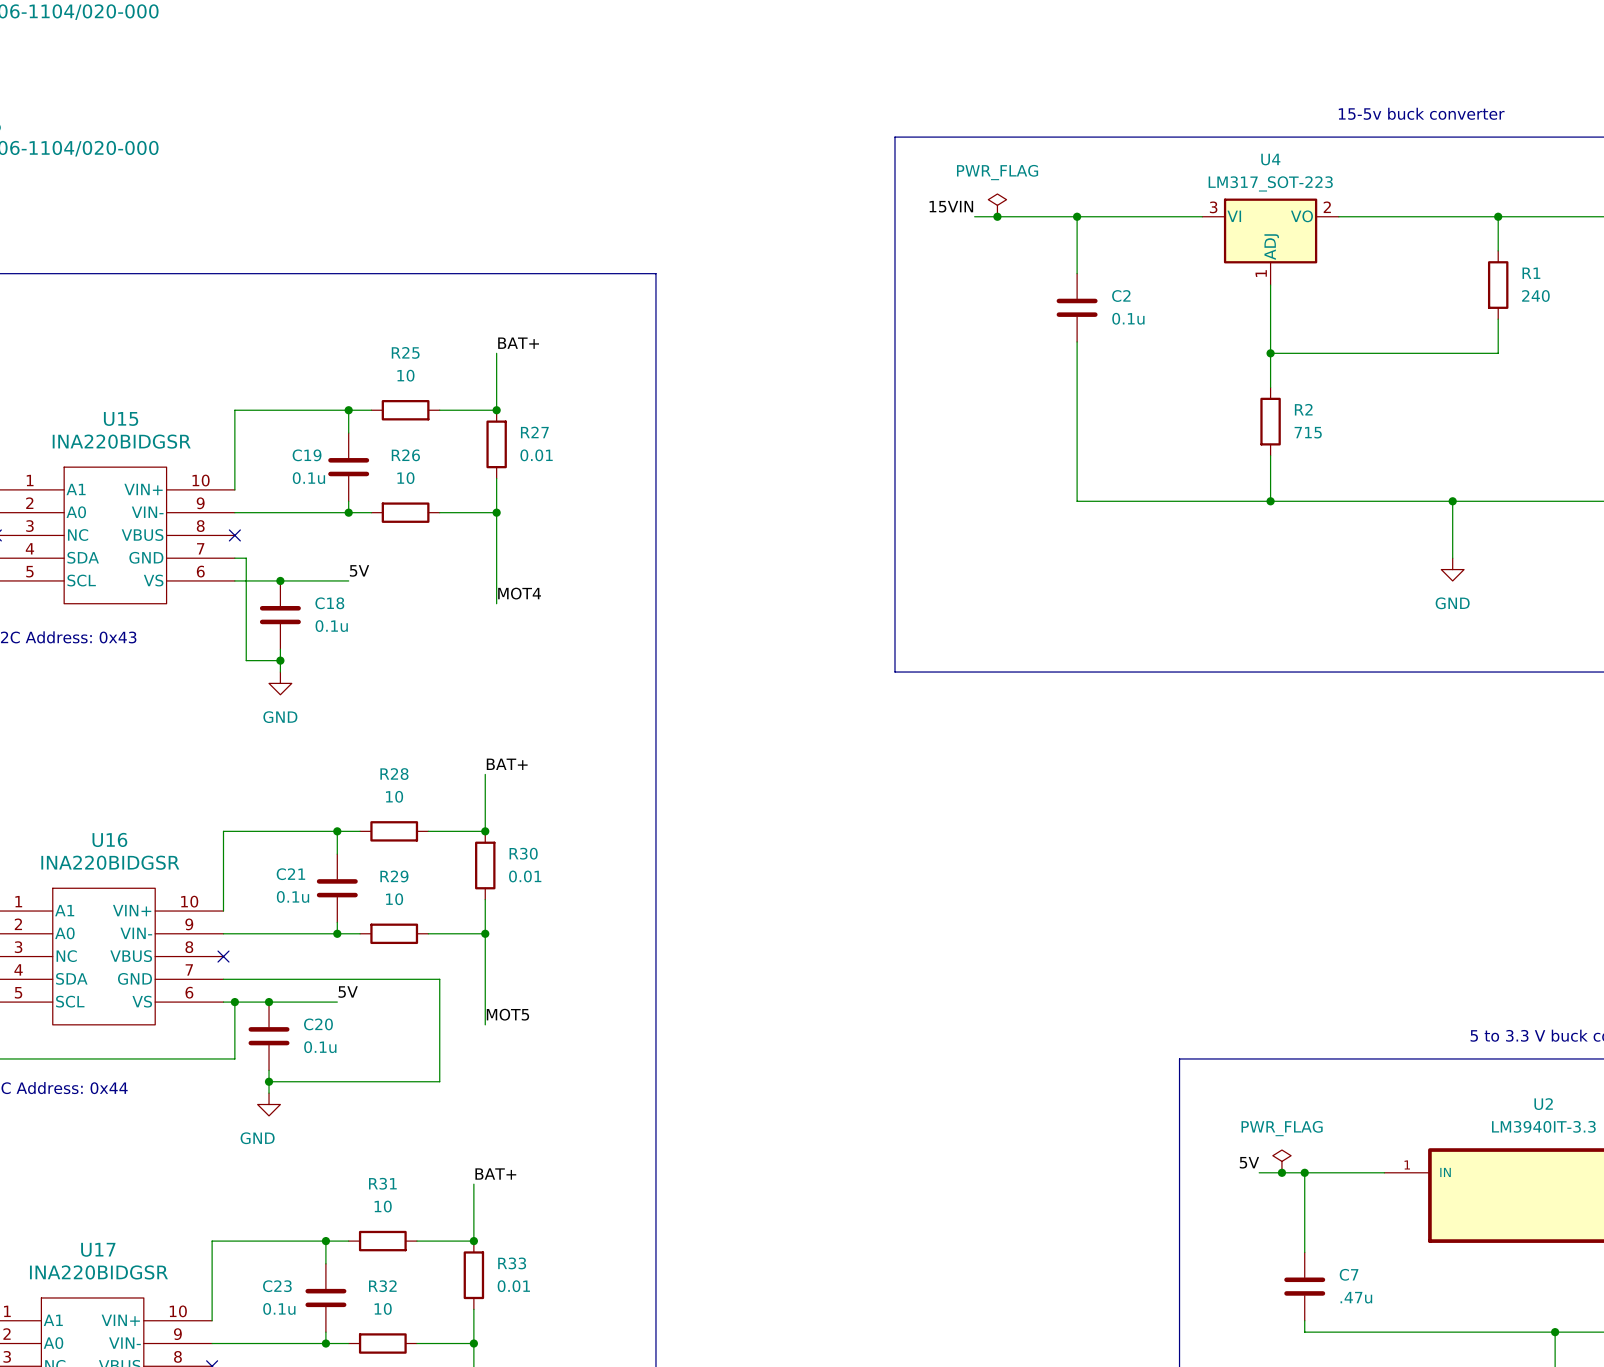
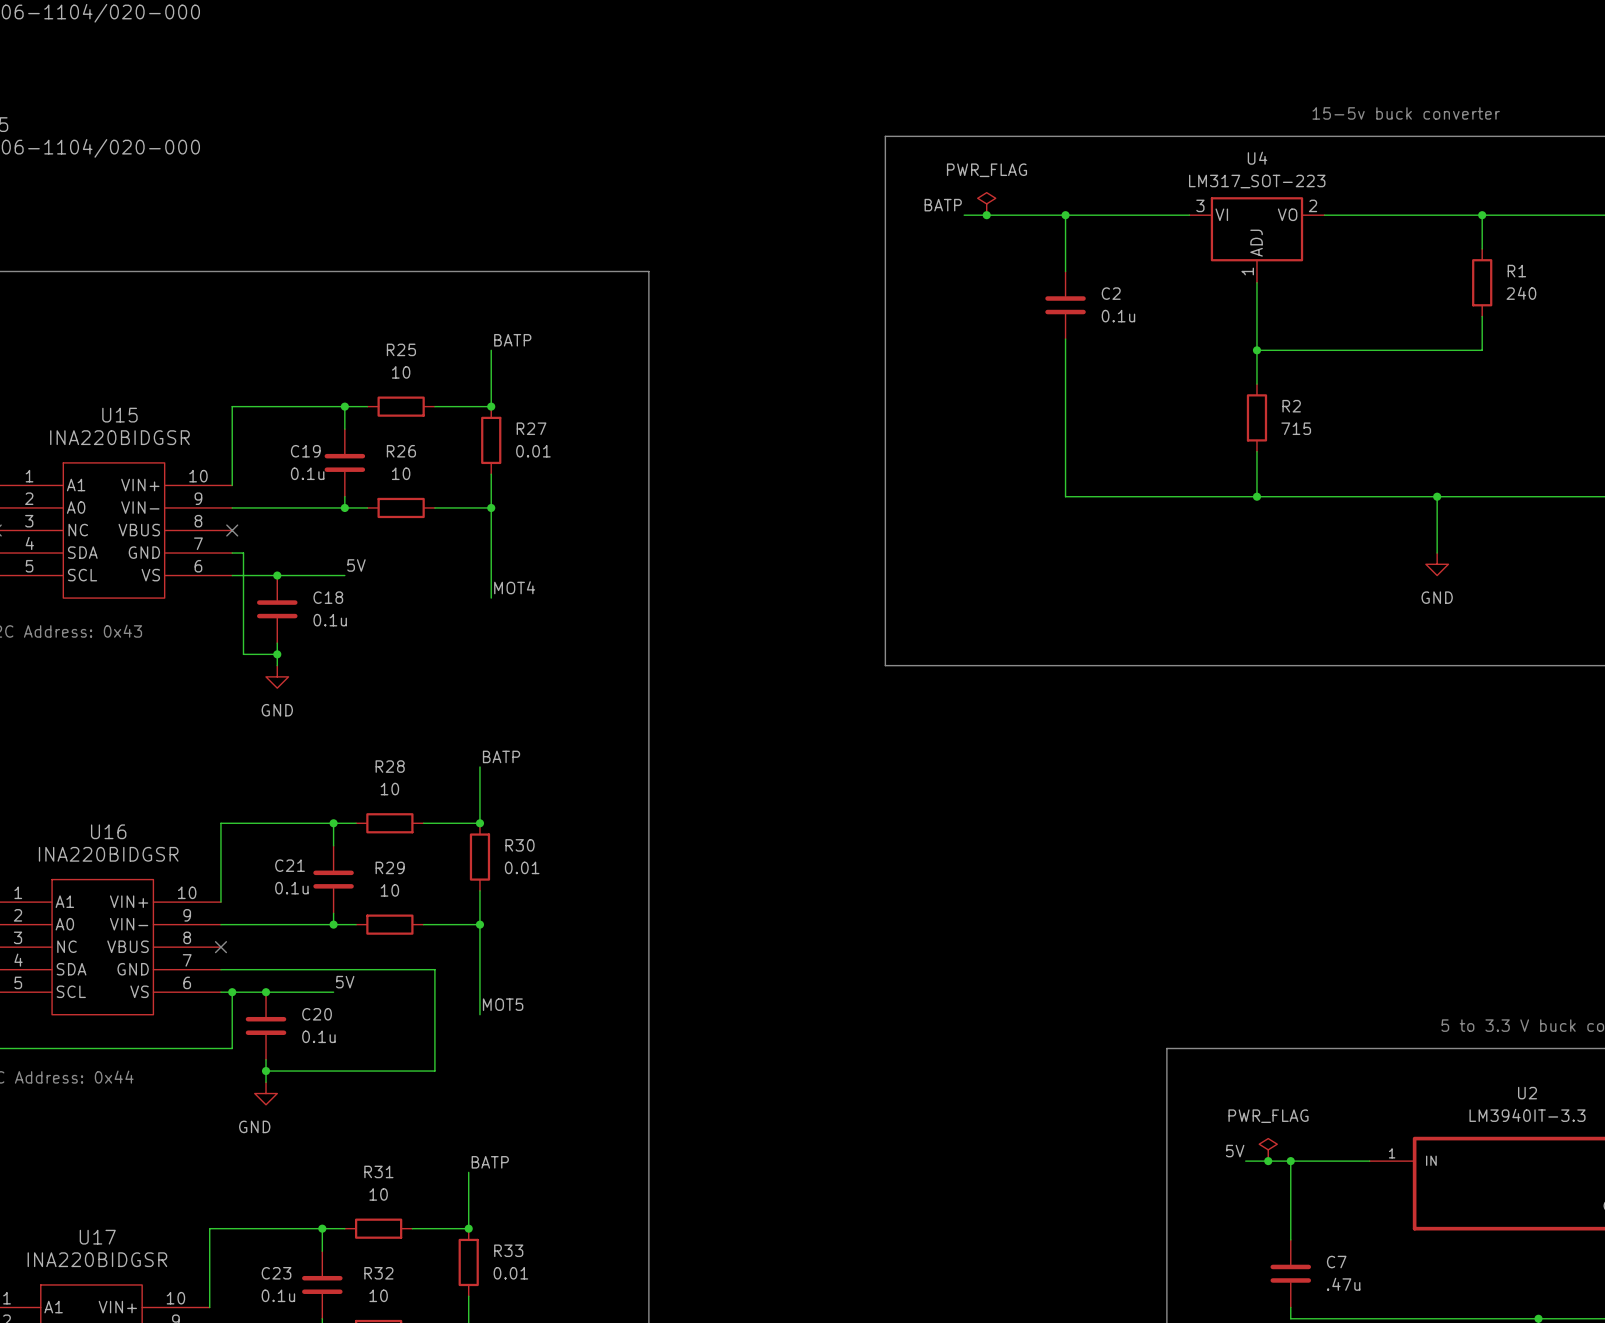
label: 15VIN (951, 206) -> BATP (943, 205)
label: BAT+ (518, 343) -> BATP (512, 340)
label: BAT+ (507, 764) -> BATP (501, 756)
label: BAT+ (495, 1174) -> BATP (490, 1162)

